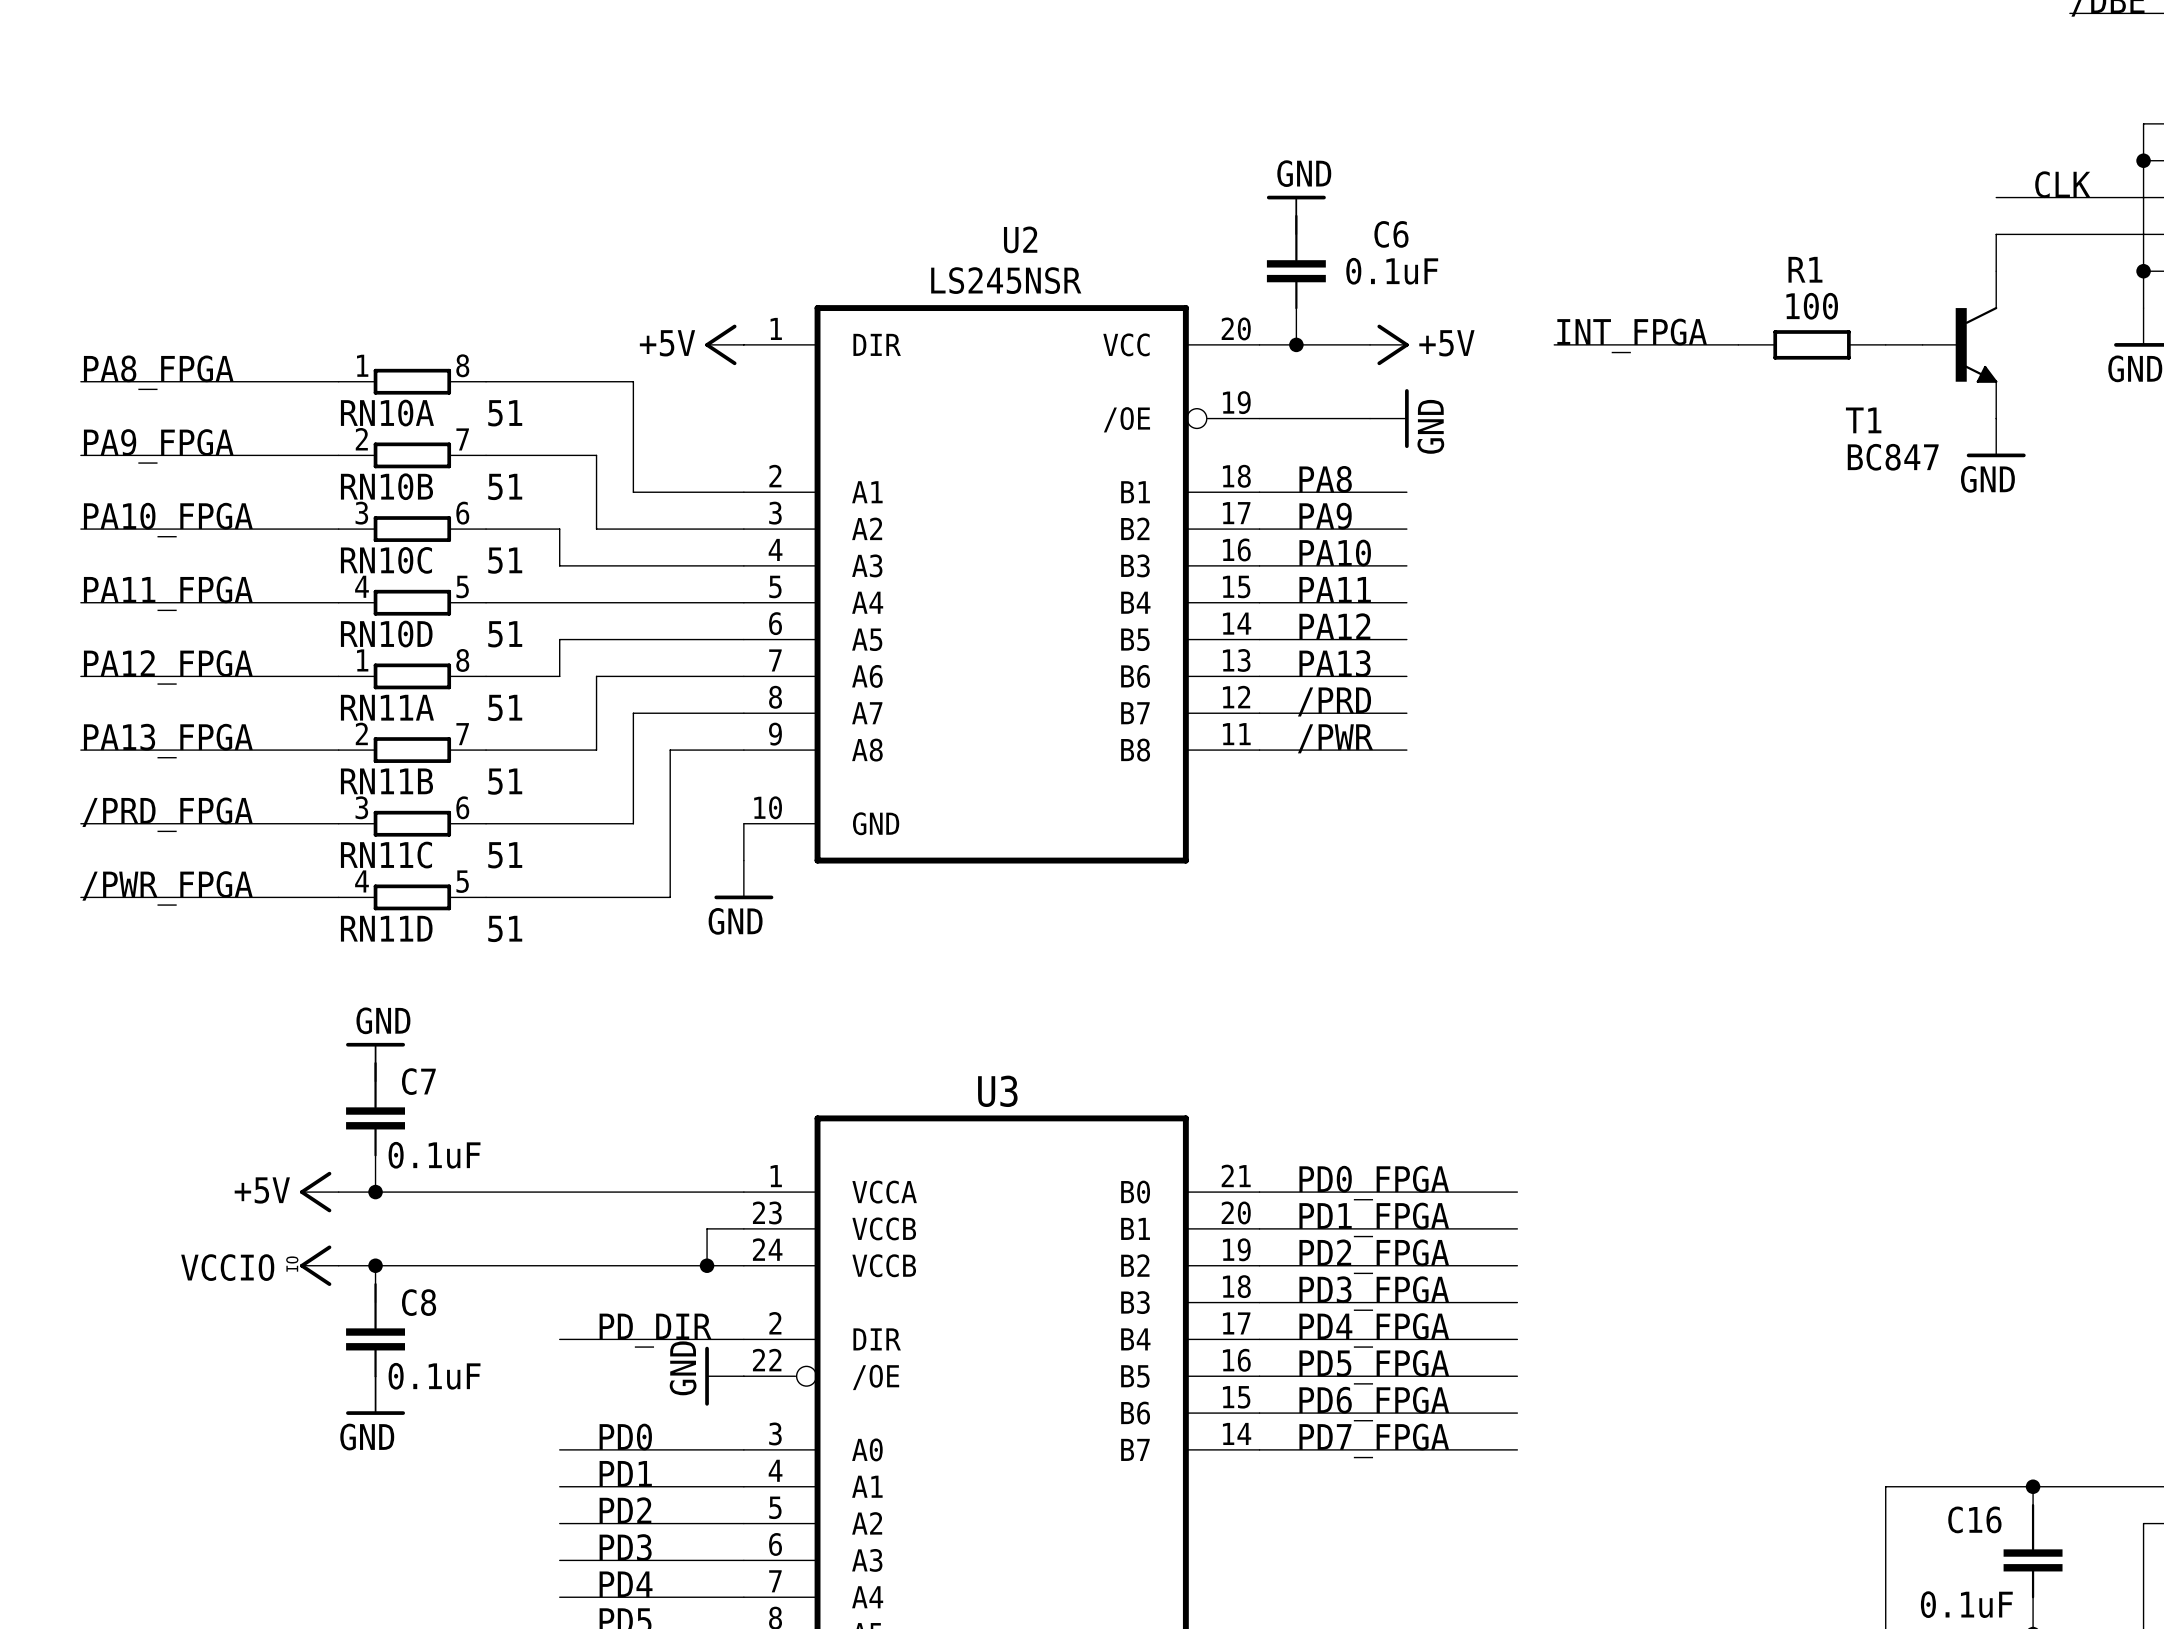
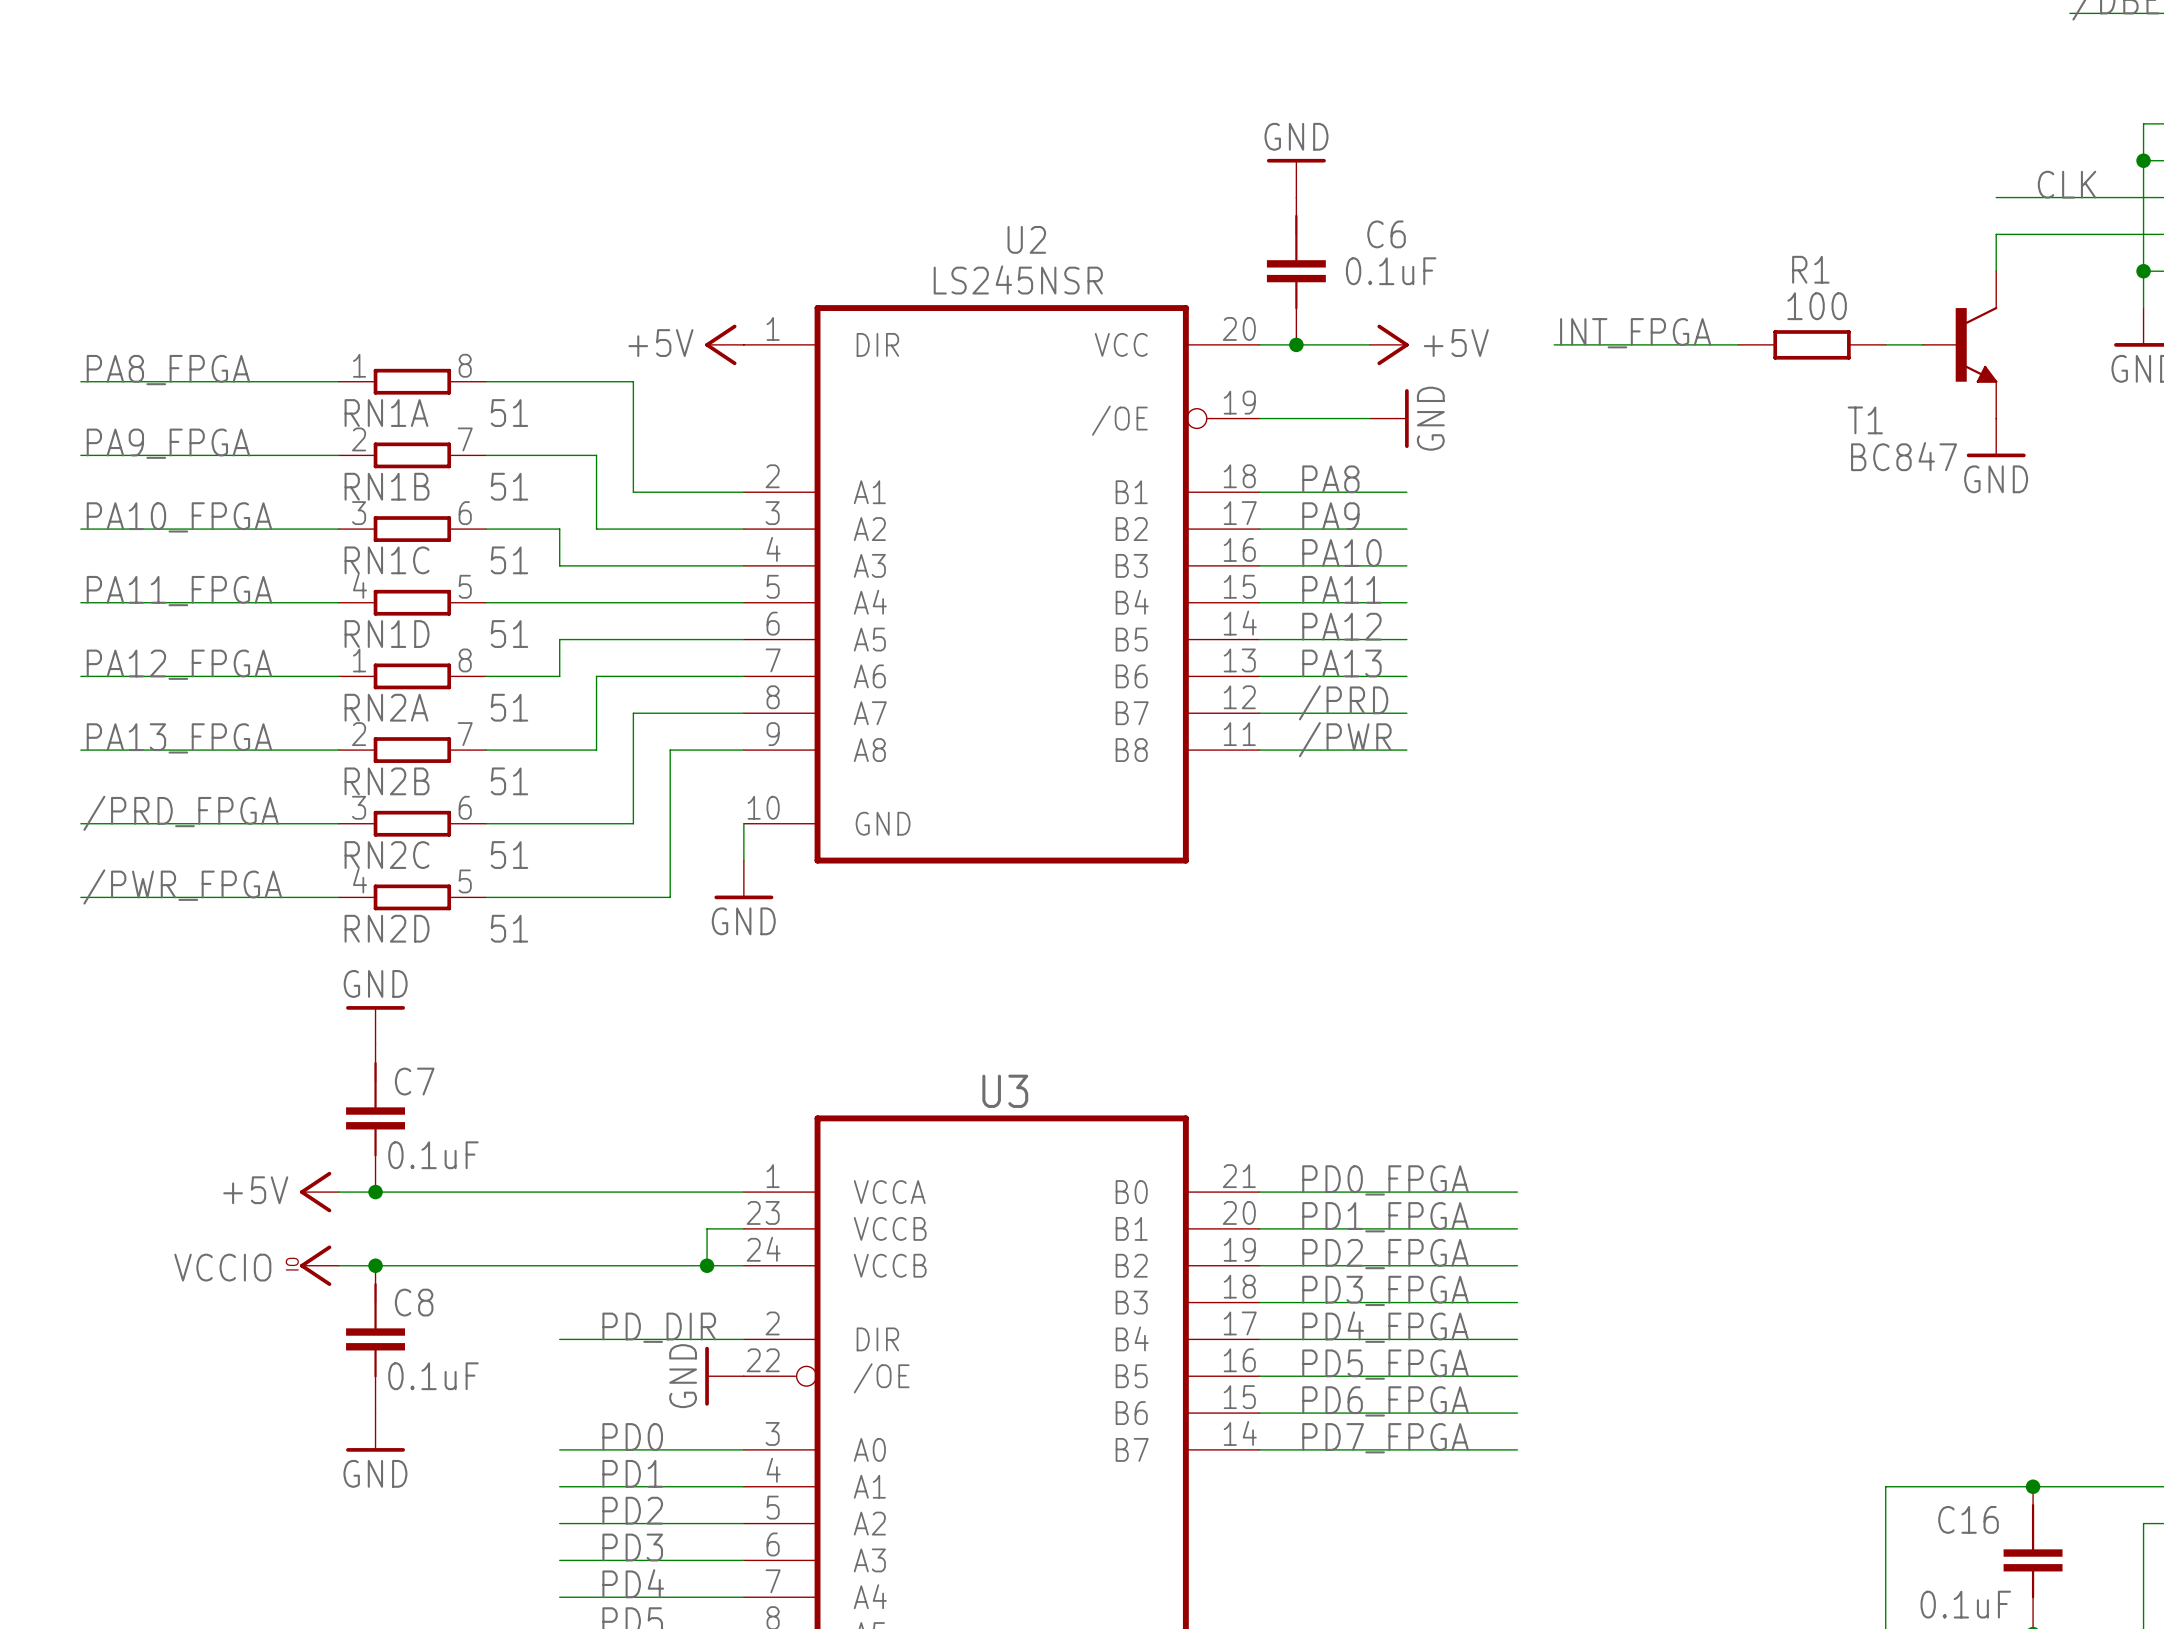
power symbol position: GND (1296, 215) -> GND (1296, 178)
RN10A name: RN10A (387, 413) -> RN1A (386, 413)
RN10B name: RN10B (386, 486) -> RN1B (387, 486)
RN10C name: RN10C (386, 560) -> RN1C (387, 560)
RN10D name: RN10D (386, 634) -> RN1D (387, 634)
RN11A name: RN11A (387, 707) -> RN2A (386, 707)
RN11B name: RN11B (386, 781) -> RN2B (387, 781)
RN11C name: RN11C (386, 855) -> RN2C (387, 855)
RN11D name: RN11D (386, 928) -> RN2D (387, 928)
power symbol position: GND (375, 1062) -> GND (375, 1025)
power symbol position: GND (375, 1395) -> GND (375, 1432)

